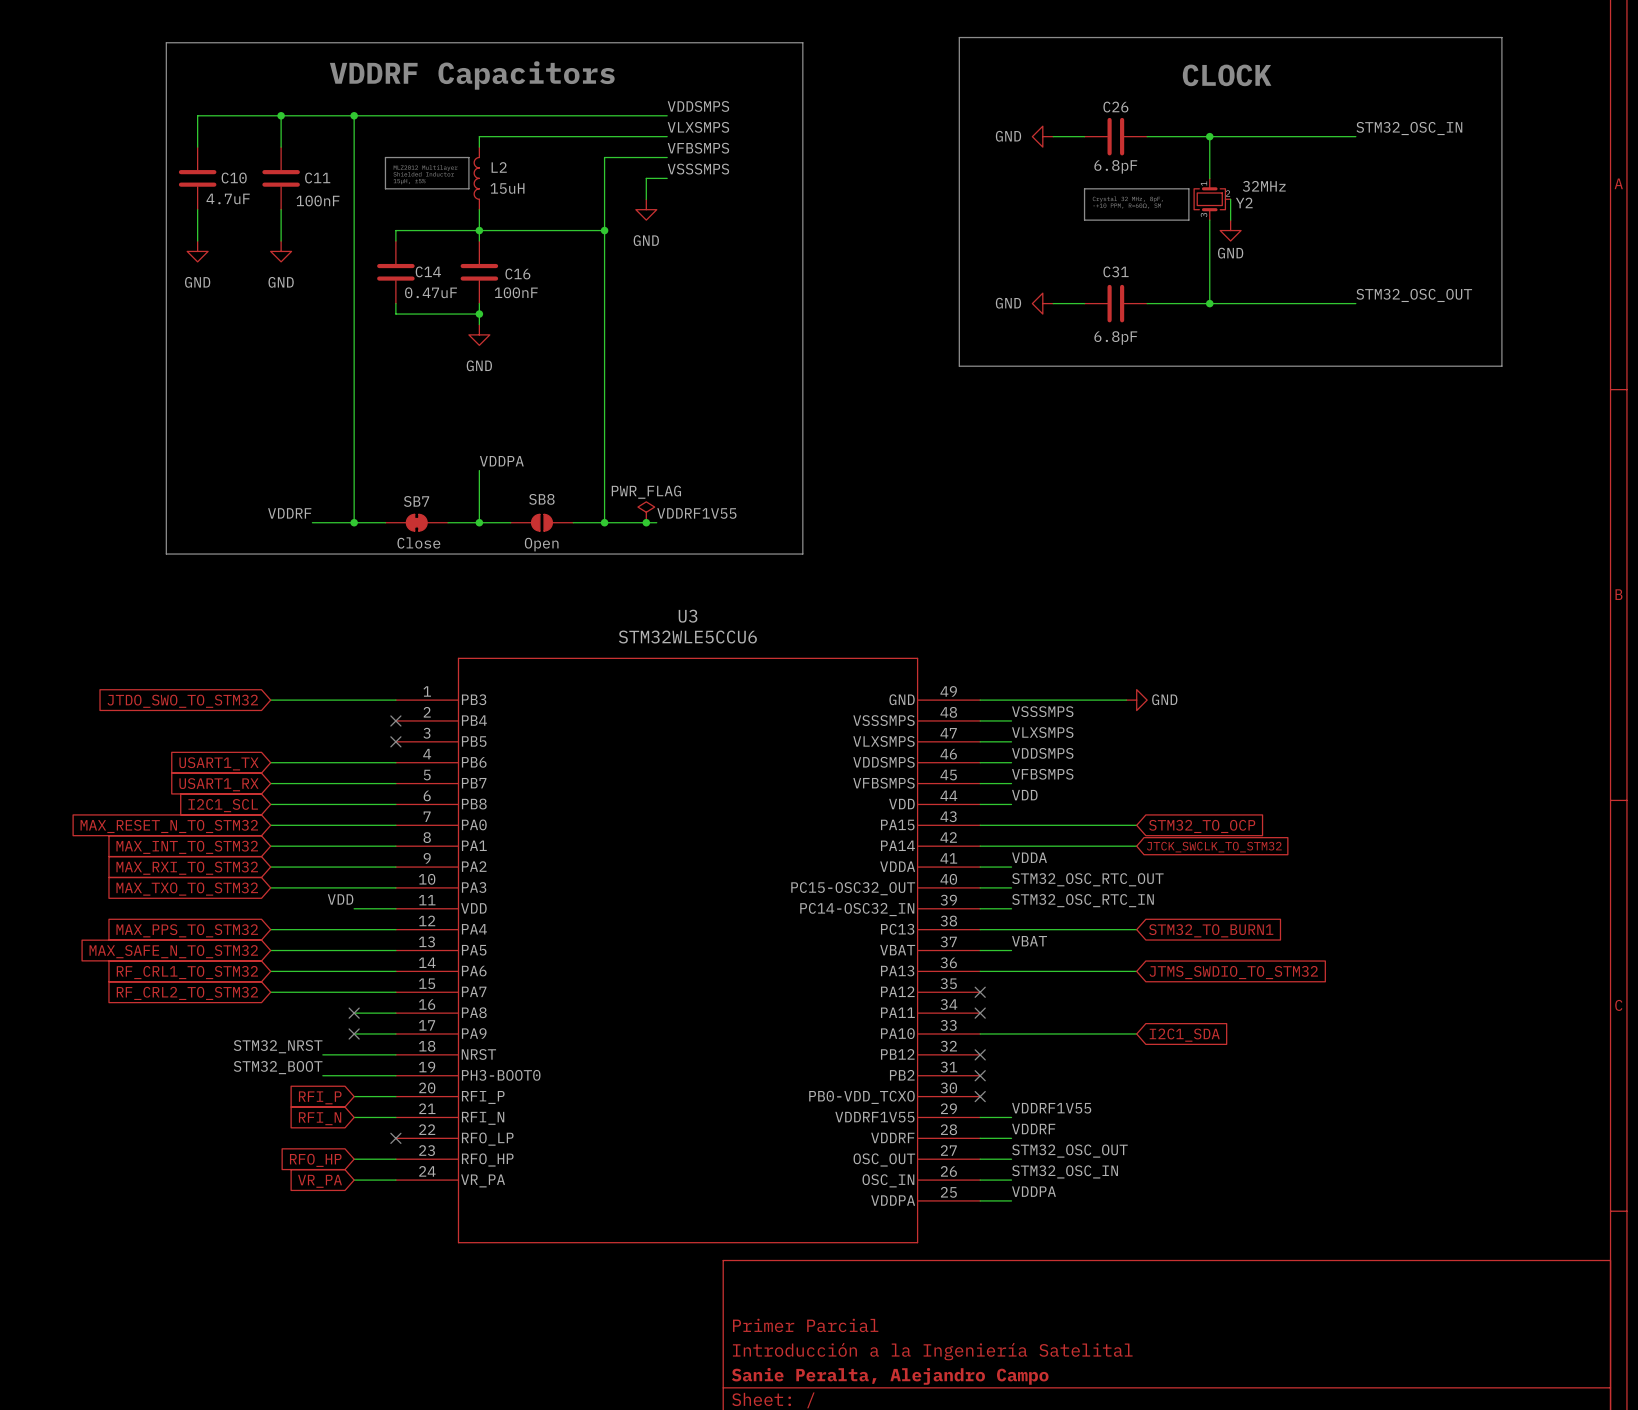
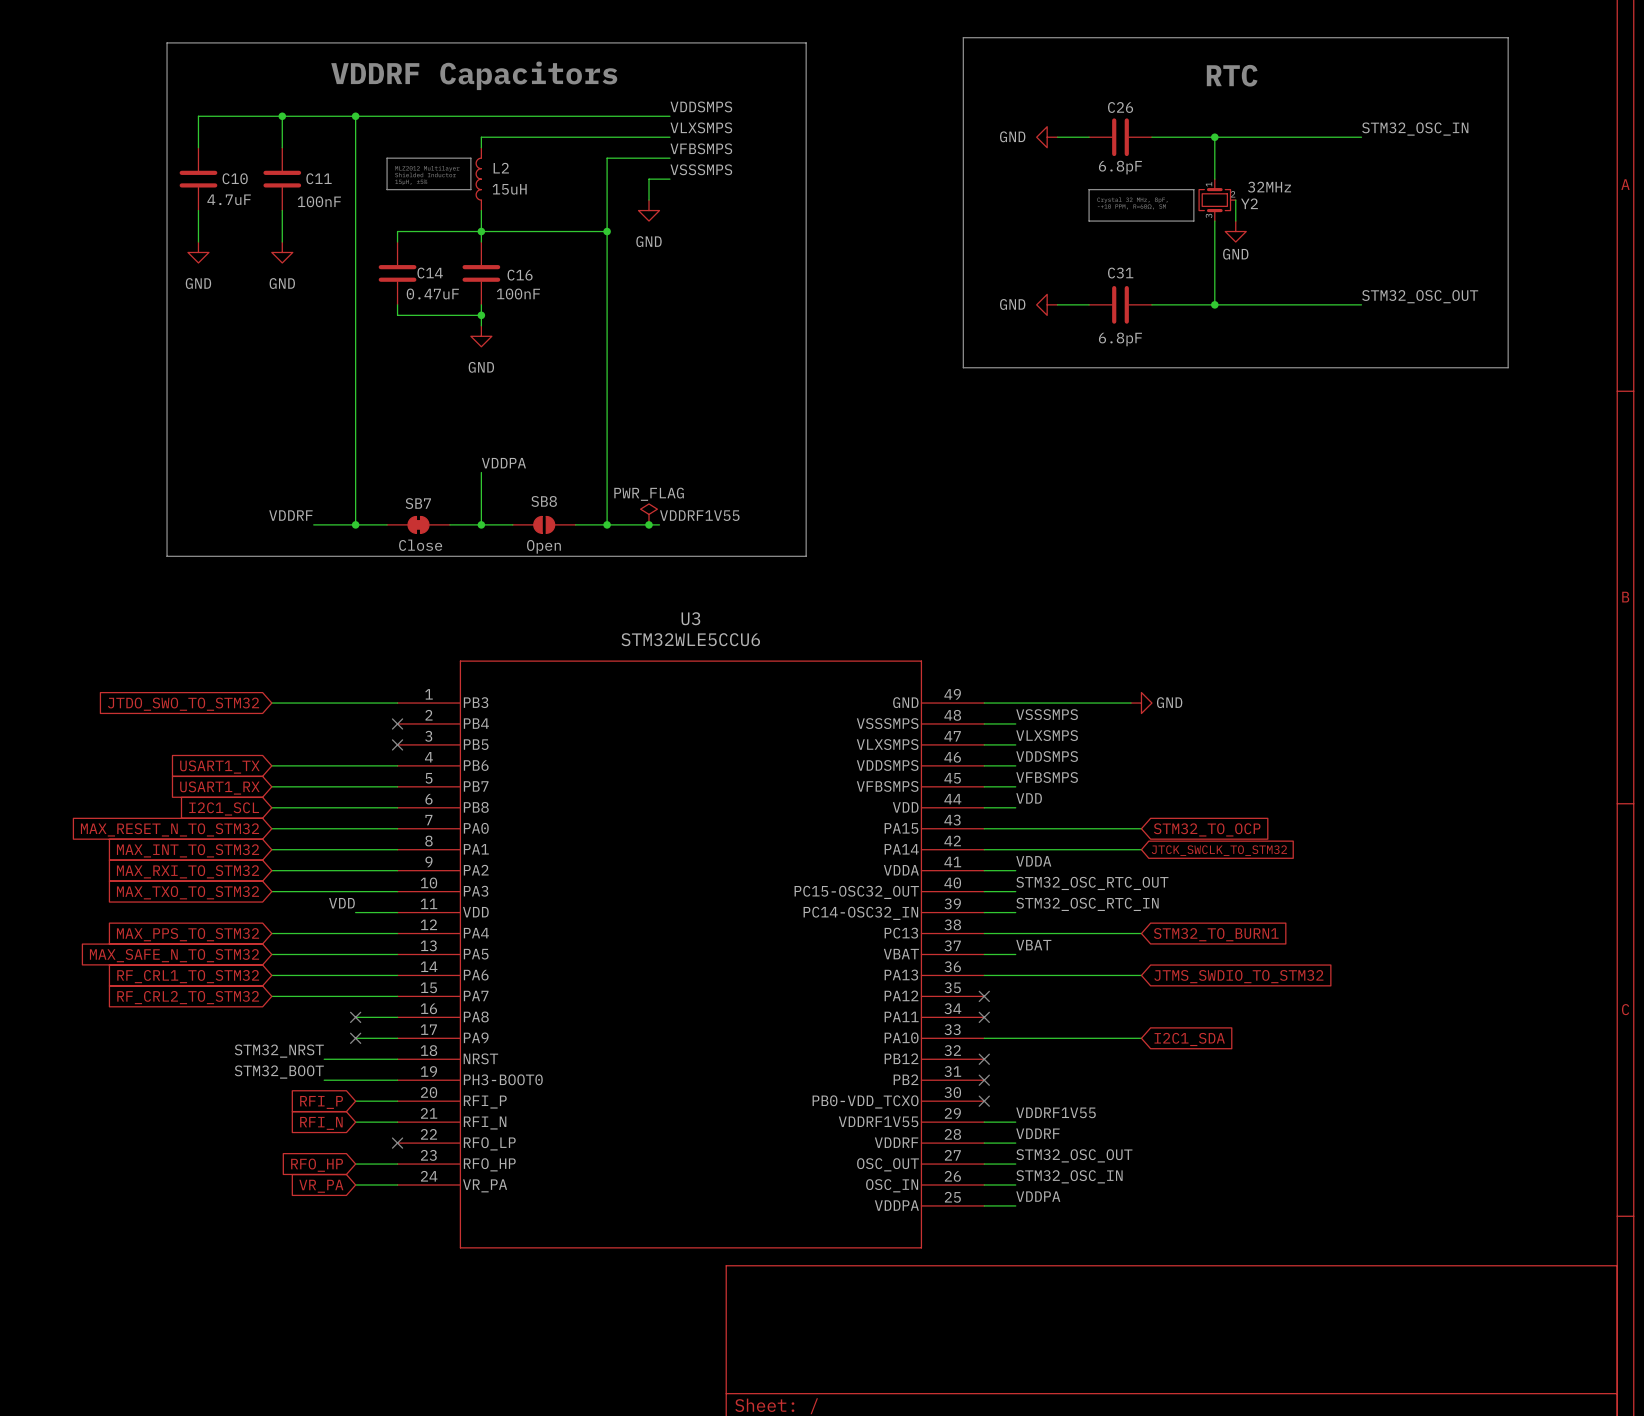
text: CLOCK (1227, 75) -> RTC (1232, 75)
title block: Primer Parcial (805, 1325) -> none
title block: Introducción a la Ingeniería Satelital (932, 1351) -> none
title block: Sanie Peralta, Alejandro Campo (890, 1376) -> none

